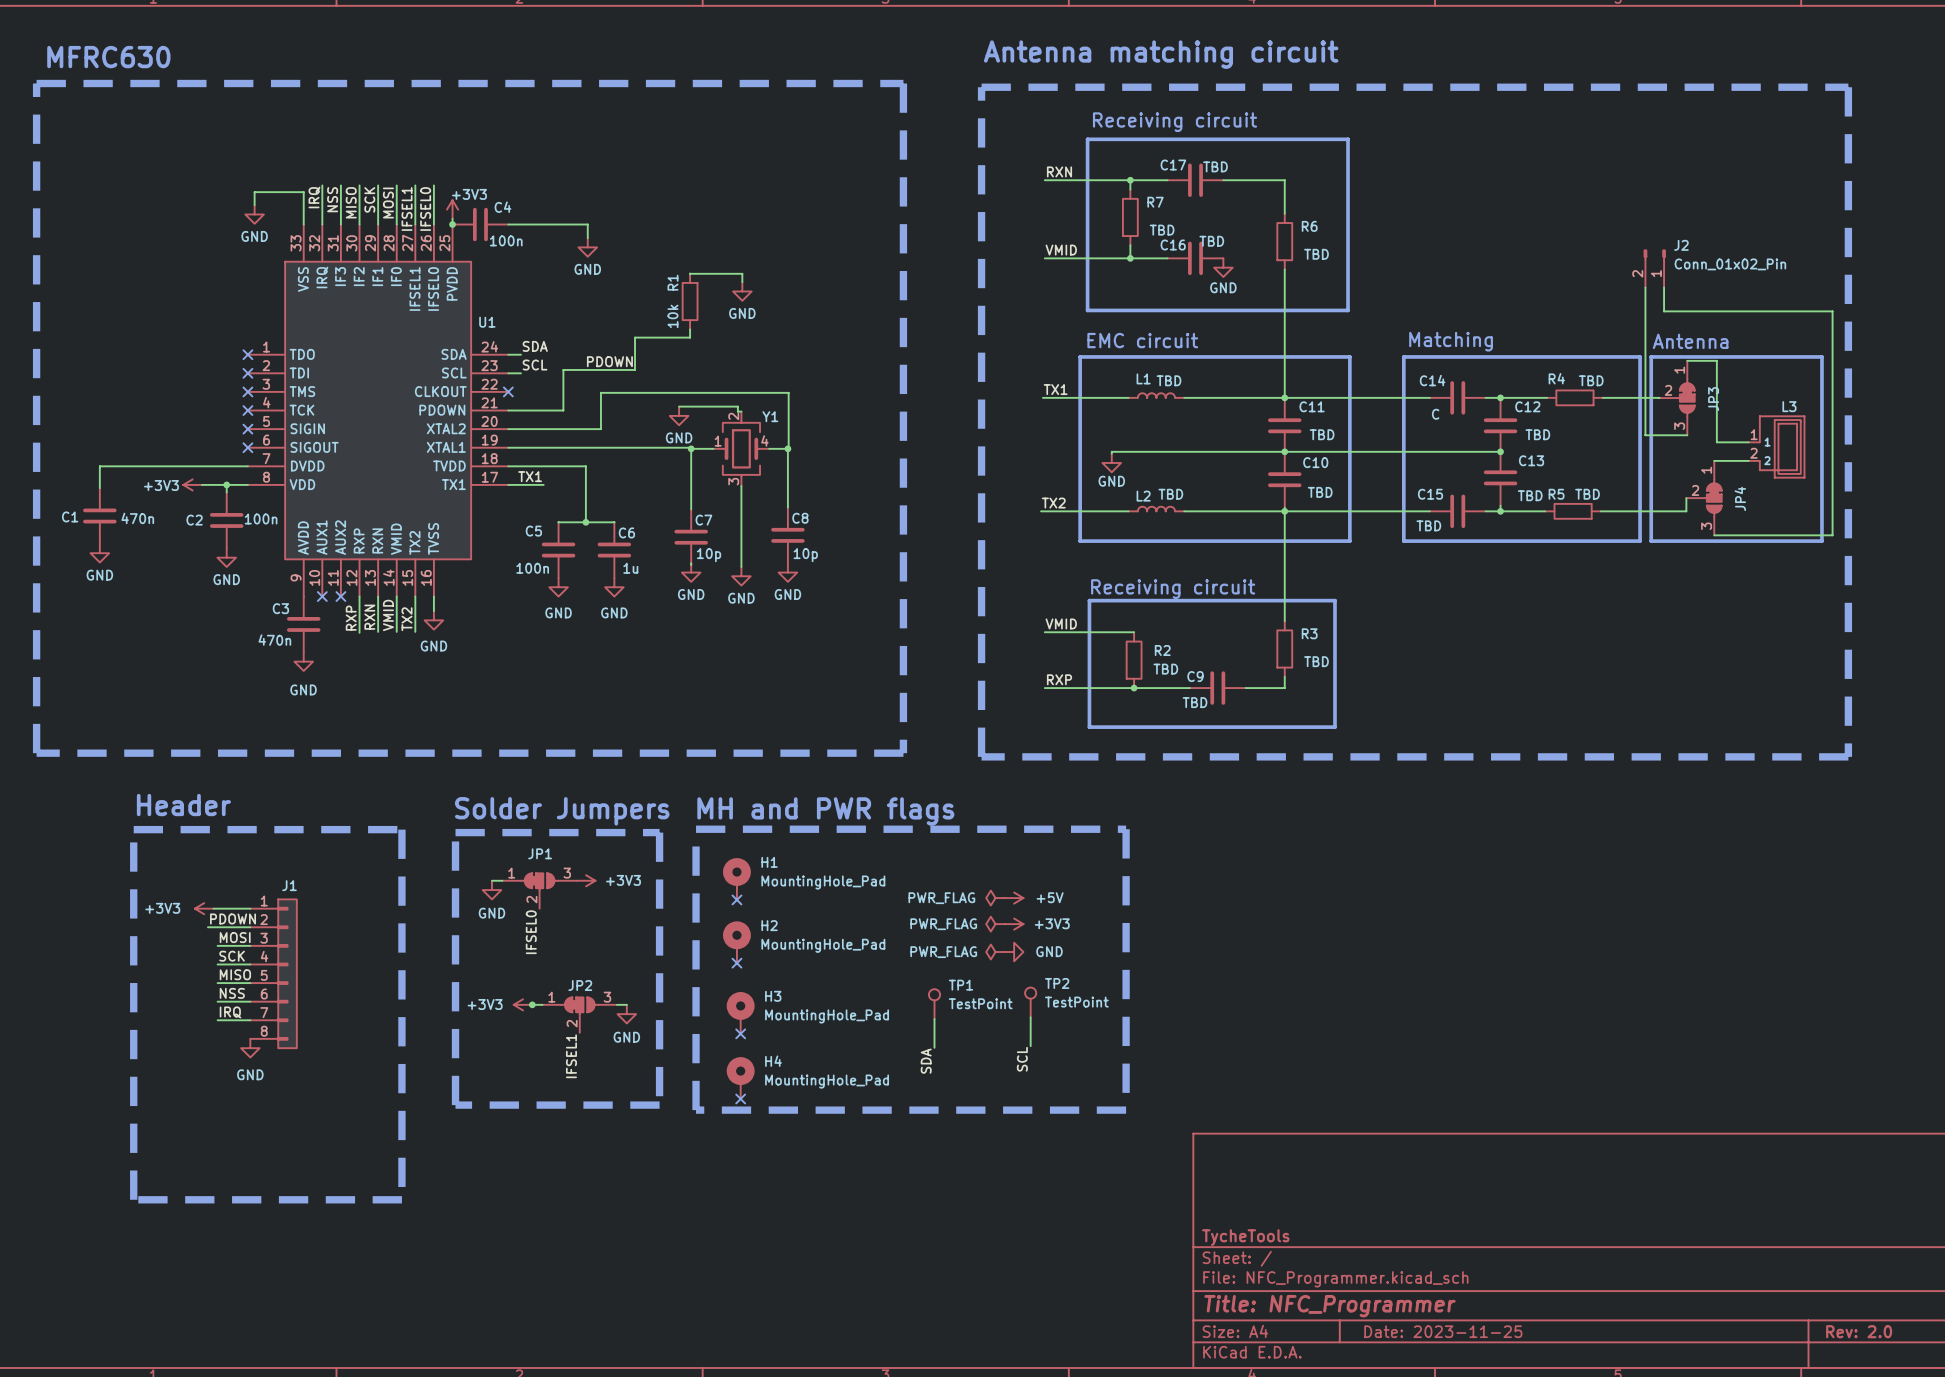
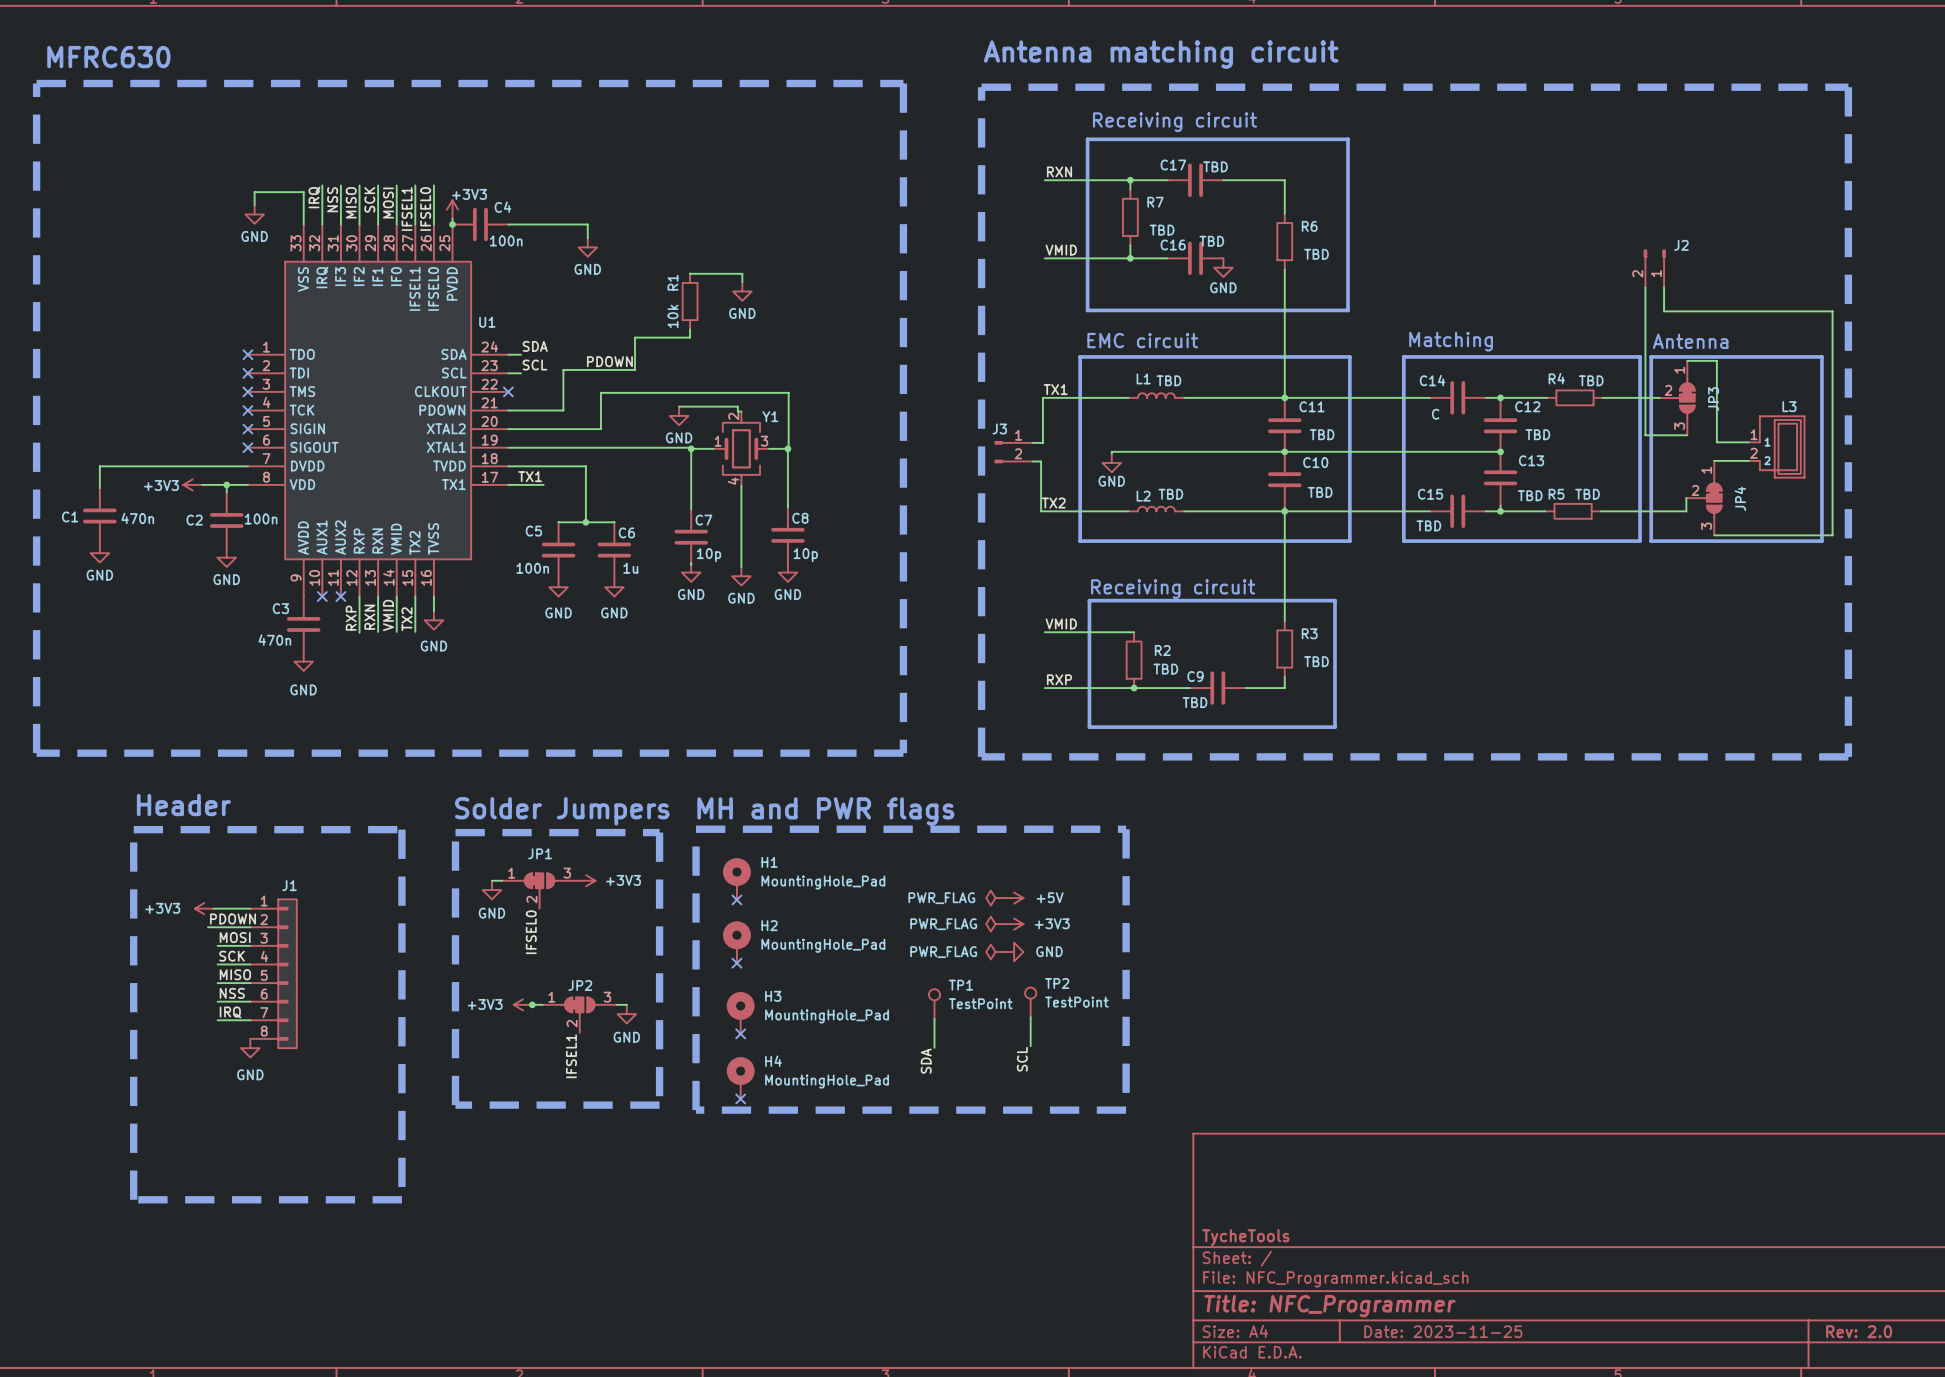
J2 value: Conn_01x02_Pin (1730, 264) -> none
wire: none -> (1042, 397) (1042, 442) (1032, 442)
Y1 pin number: 4 (764, 440) -> 3 (764, 441)
J3: none -> (1013, 452)
wire: none -> (1032, 461) (1041, 461) (1041, 511)
Y1 pin number: 3 (733, 481) -> 4 (733, 481)

